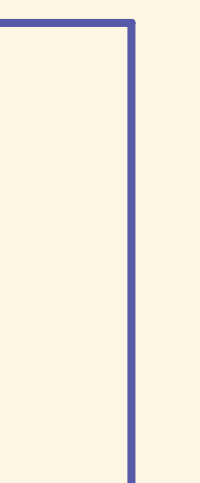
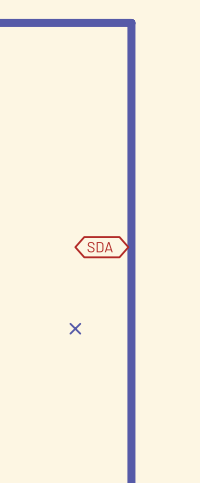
global label: none -> SDA (100, 247)
no-connect mark: none -> (75, 328)

